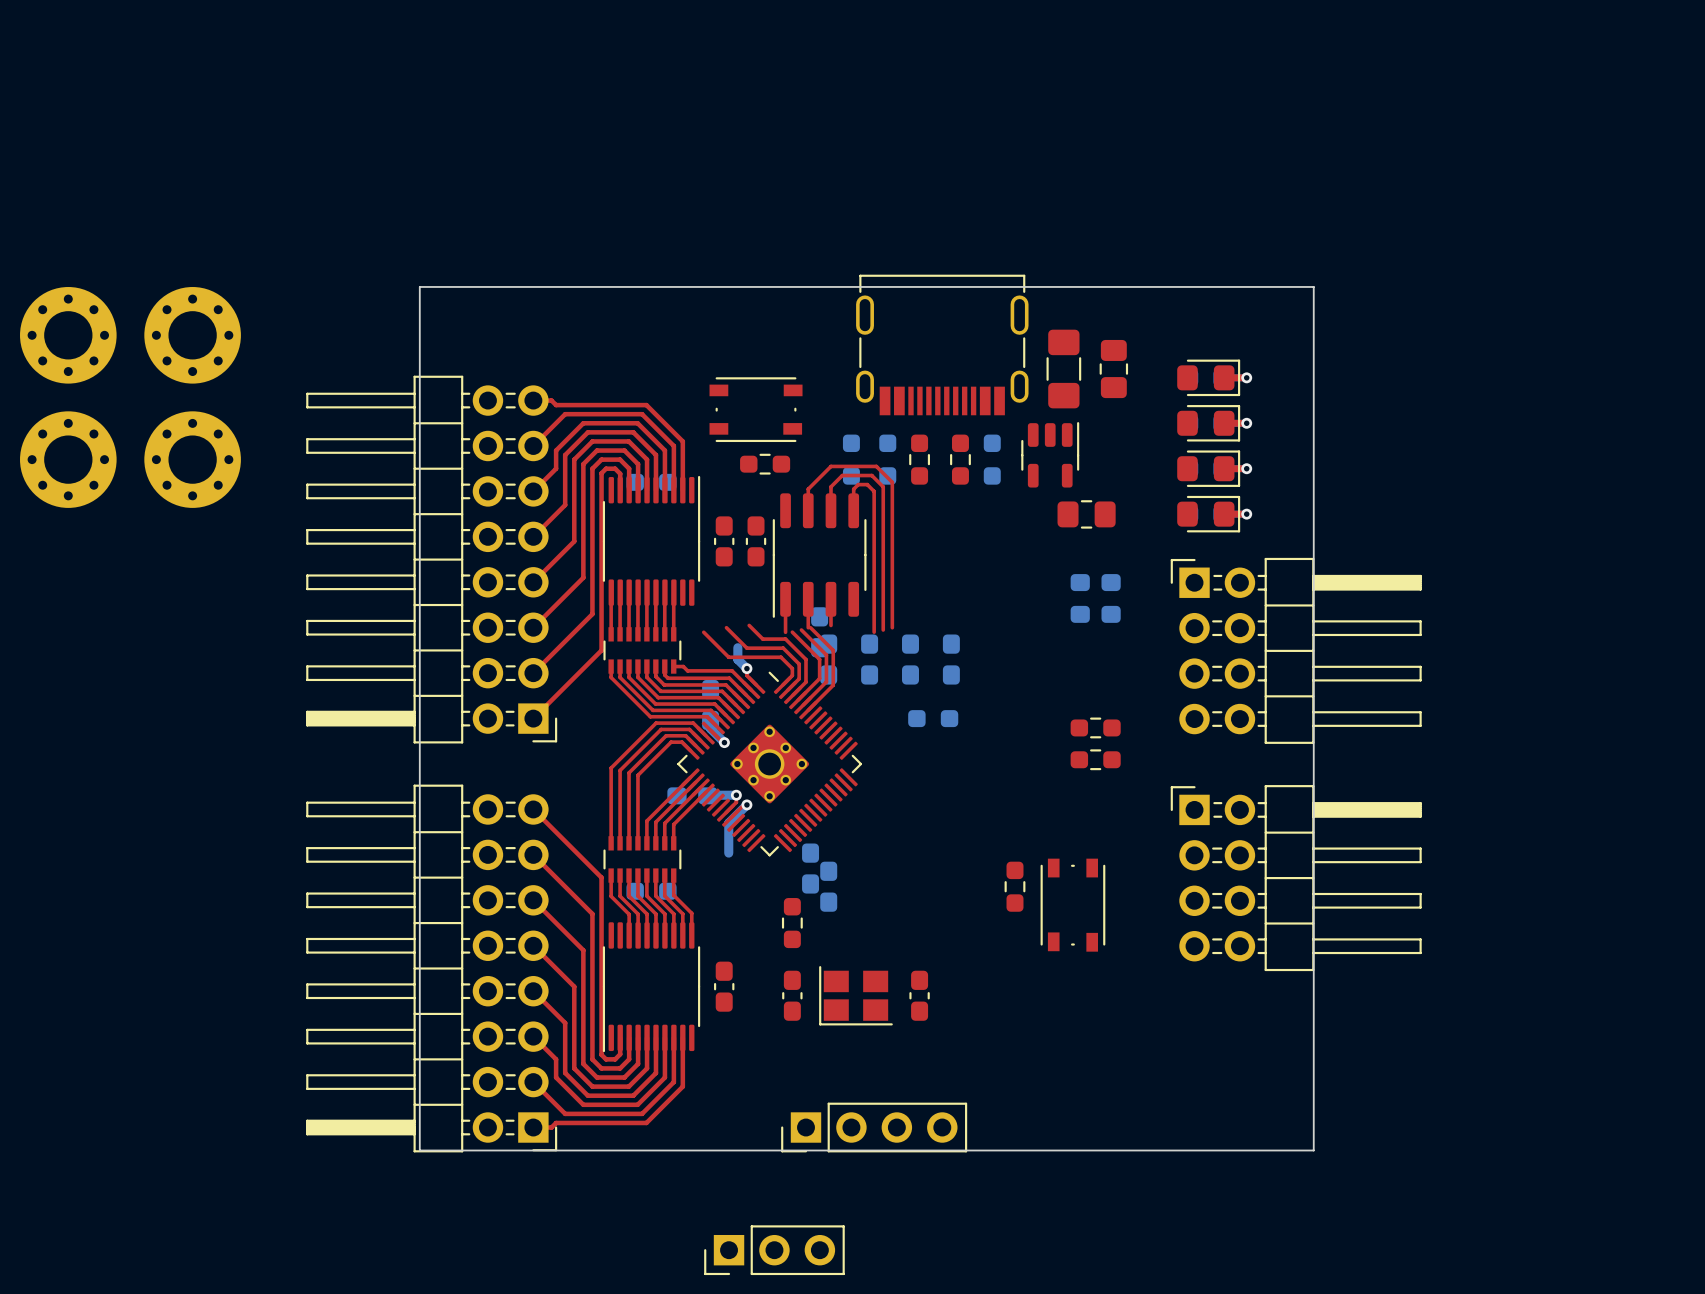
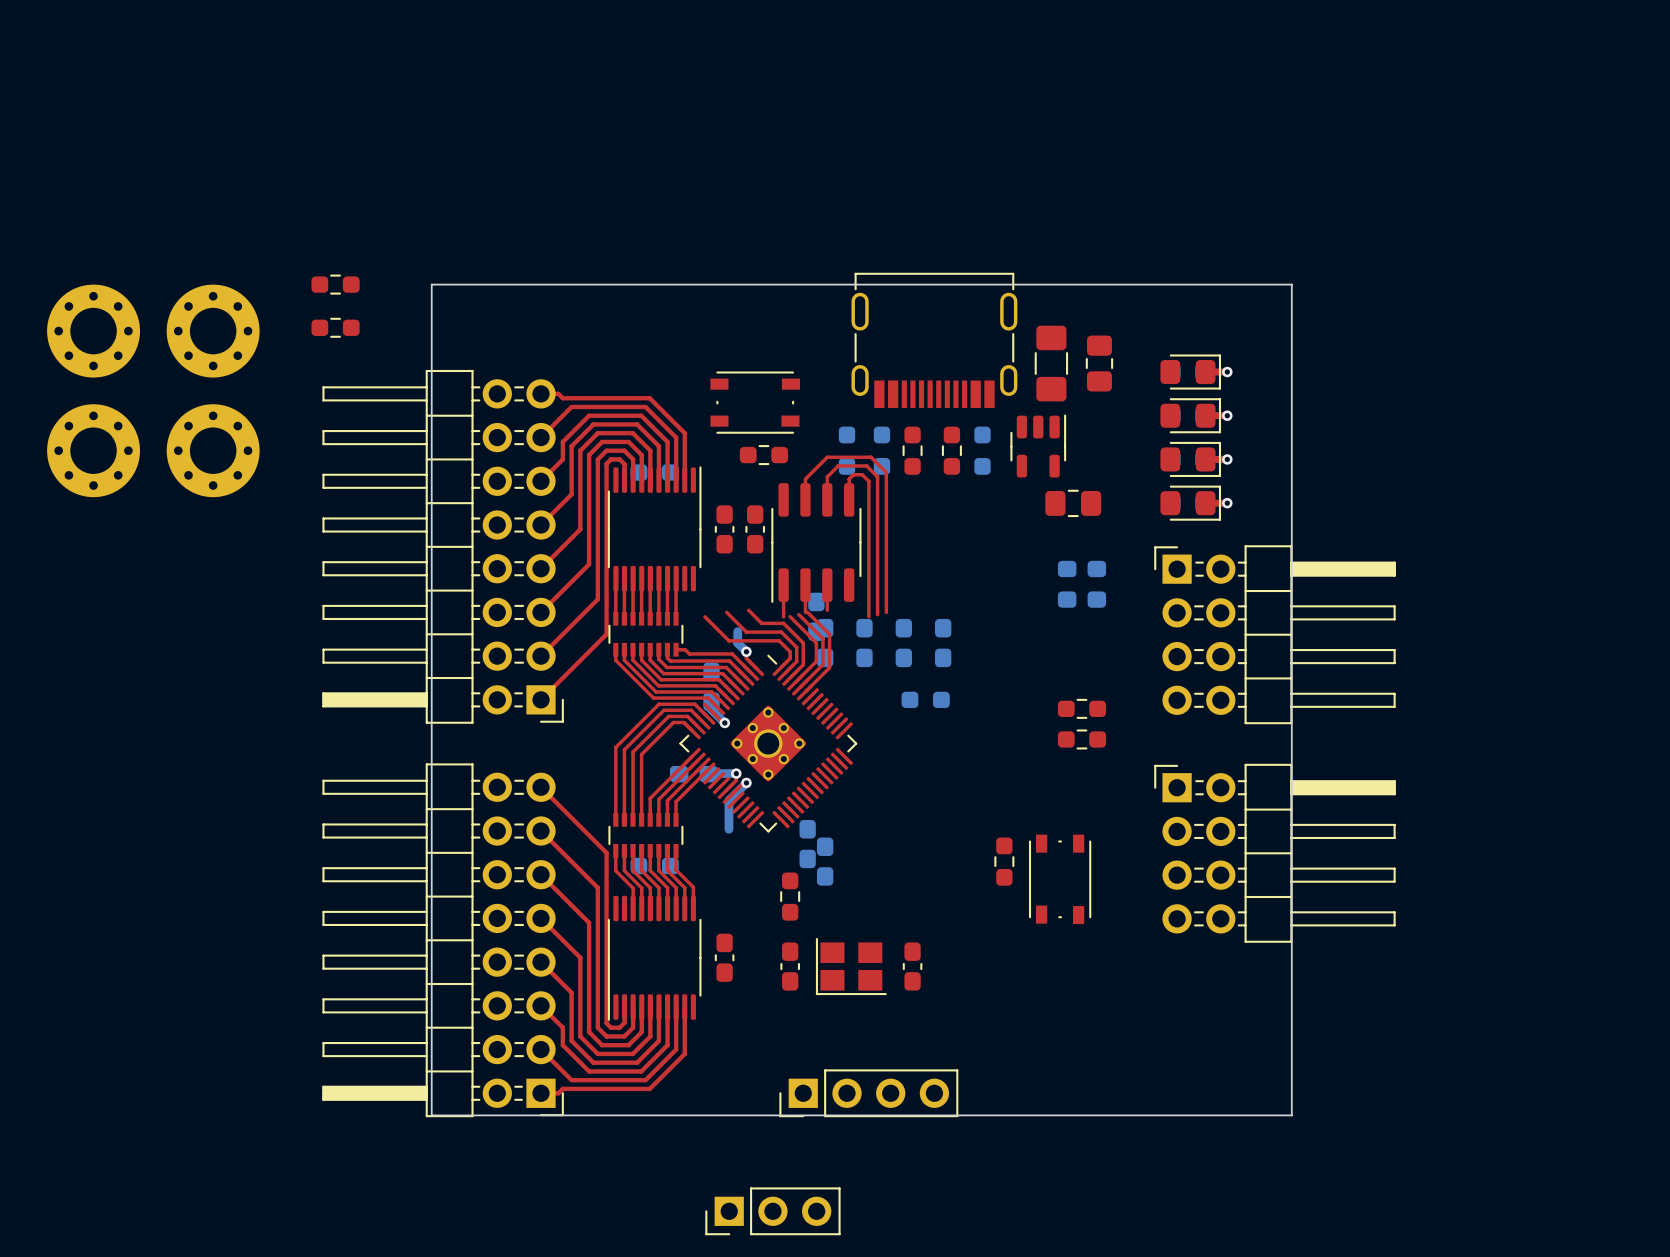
part: none -> (335, 284)
part: none -> (335, 327)

